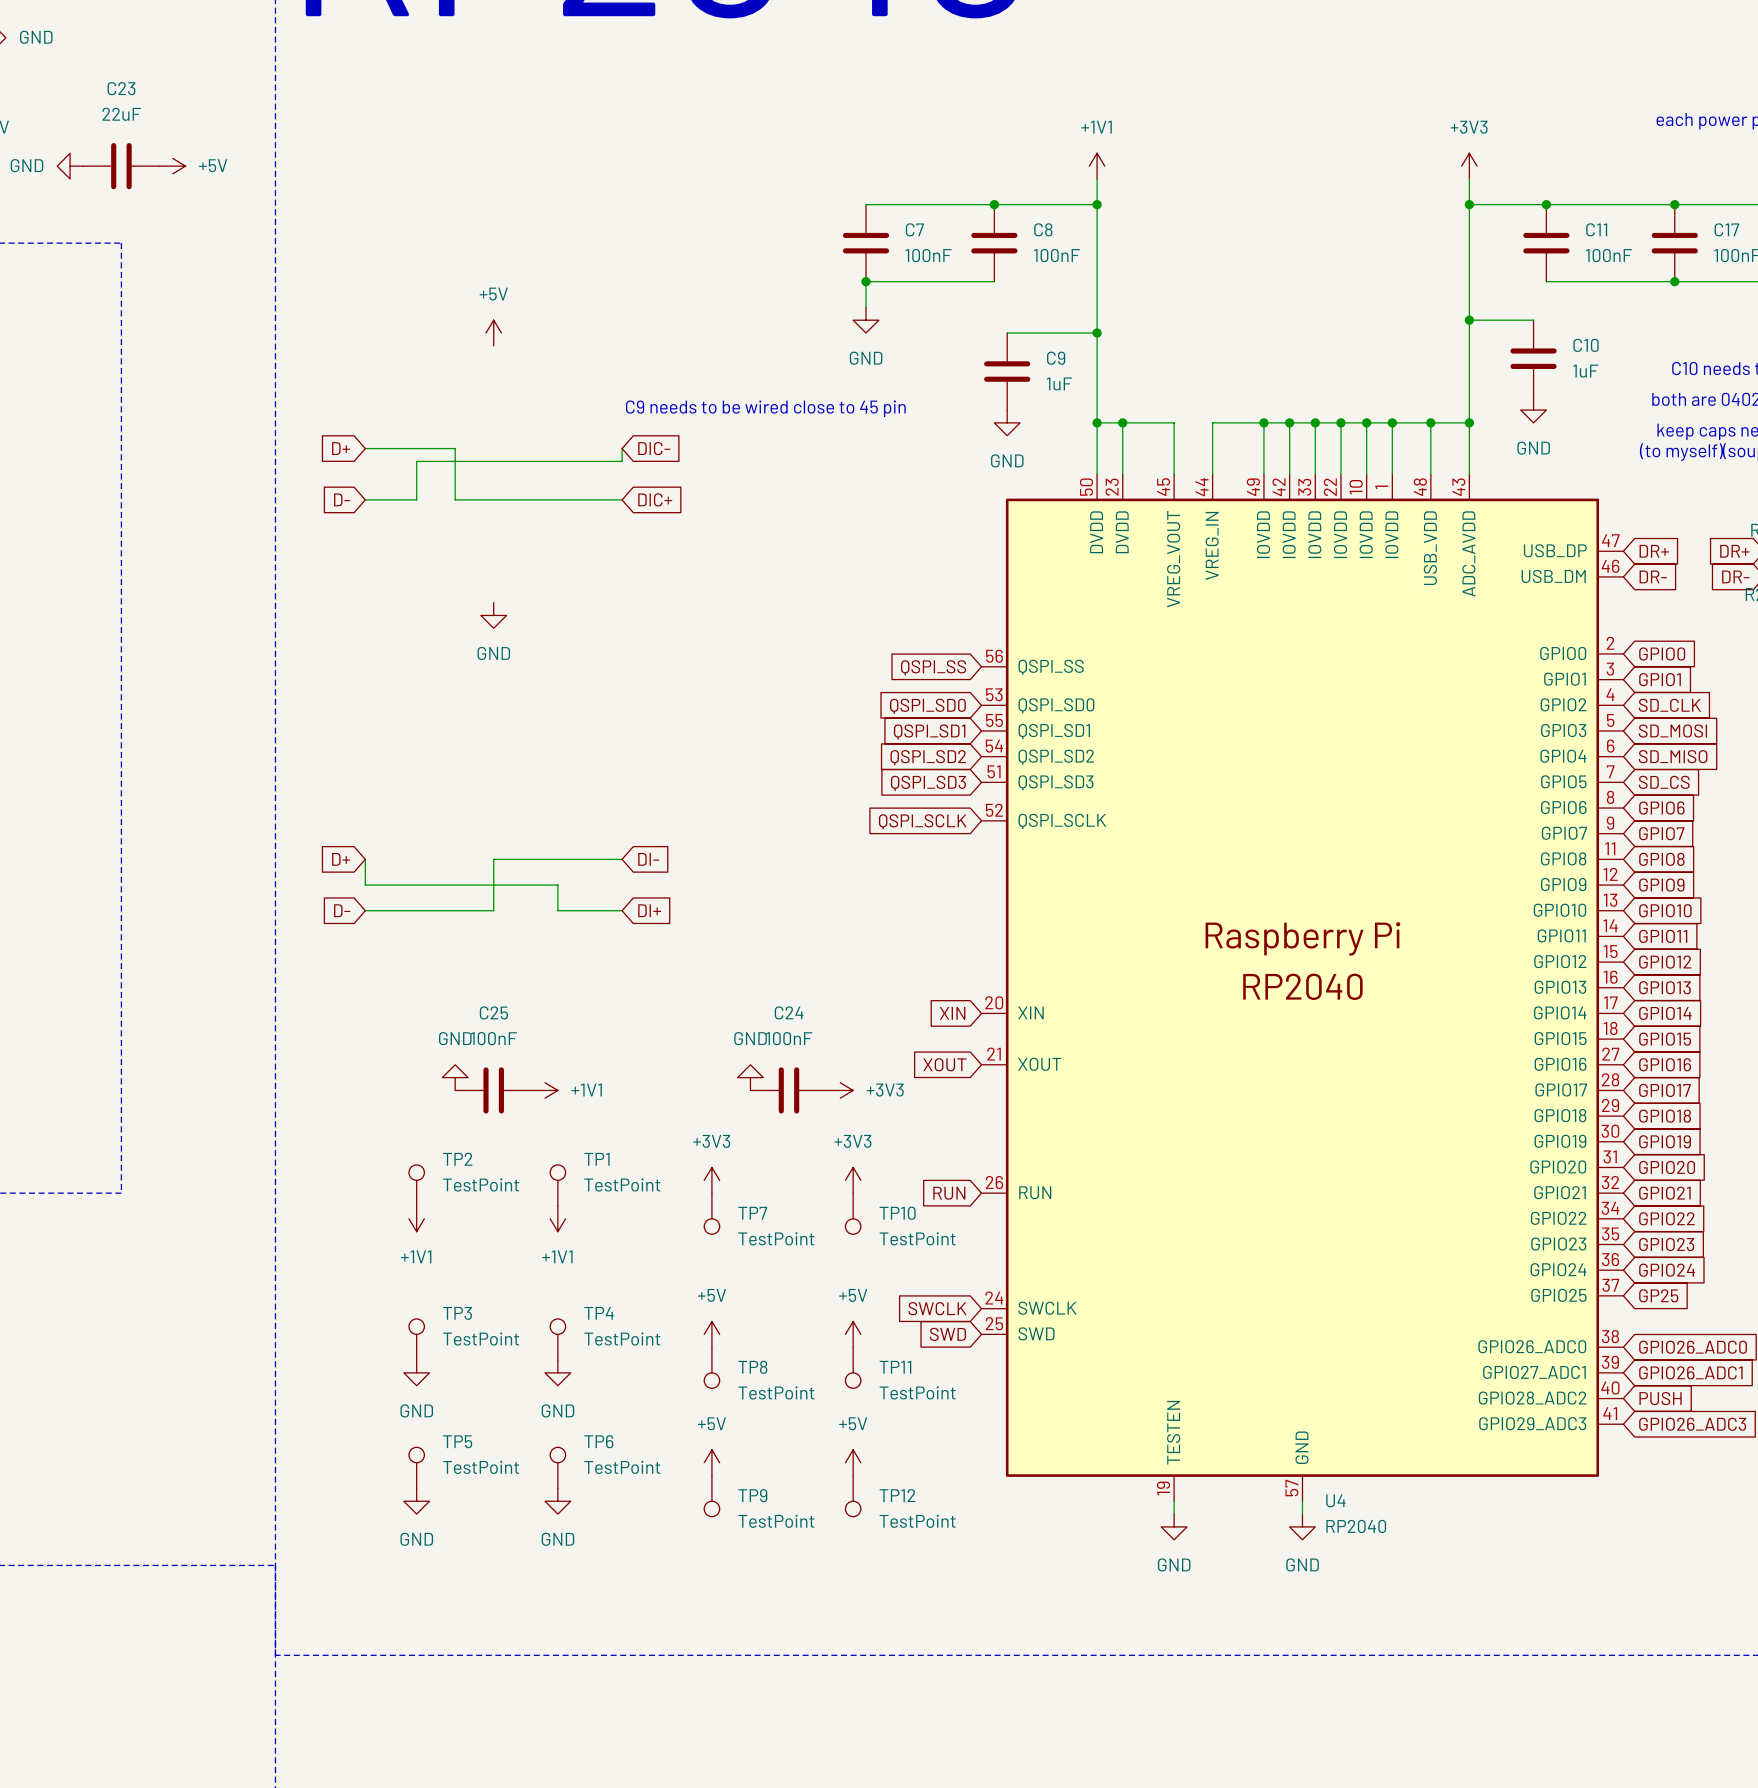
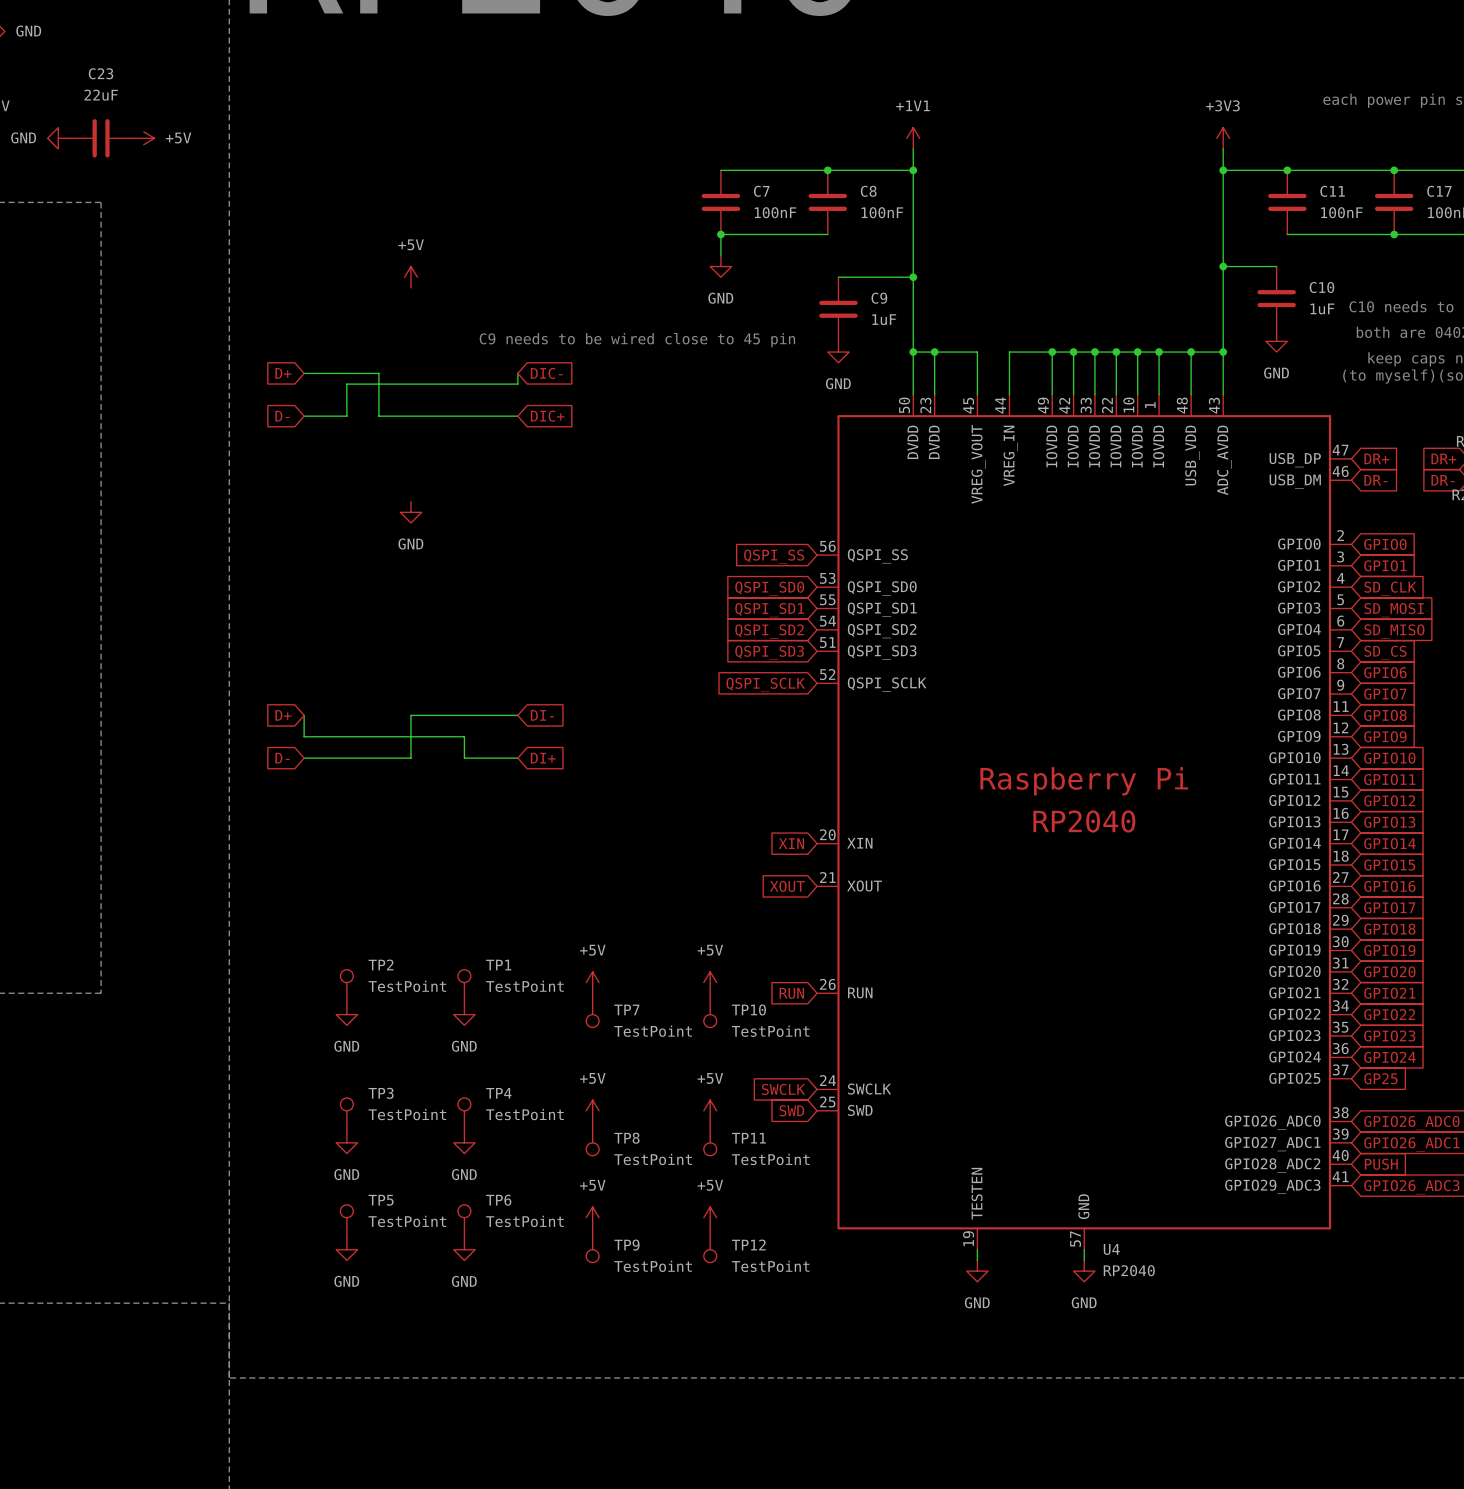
power symbol: GND (455, 1077) -> none
power symbol: GND (750, 1077) -> none
C25: 100nF (493, 1090) -> none
power symbol: +1V1 (545, 1090) -> none
C24: 100nF (788, 1090) -> none
power symbol: +3V3 (840, 1090) -> none
power symbol: +3V3 (711, 1180) -> +5V (592, 982)
power symbol: +3V3 (853, 1180) -> +5V (710, 982)
power symbol: +1V1 (416, 1218) -> GND (346, 1014)
power symbol: +1V1 (557, 1218) -> GND (464, 1014)

